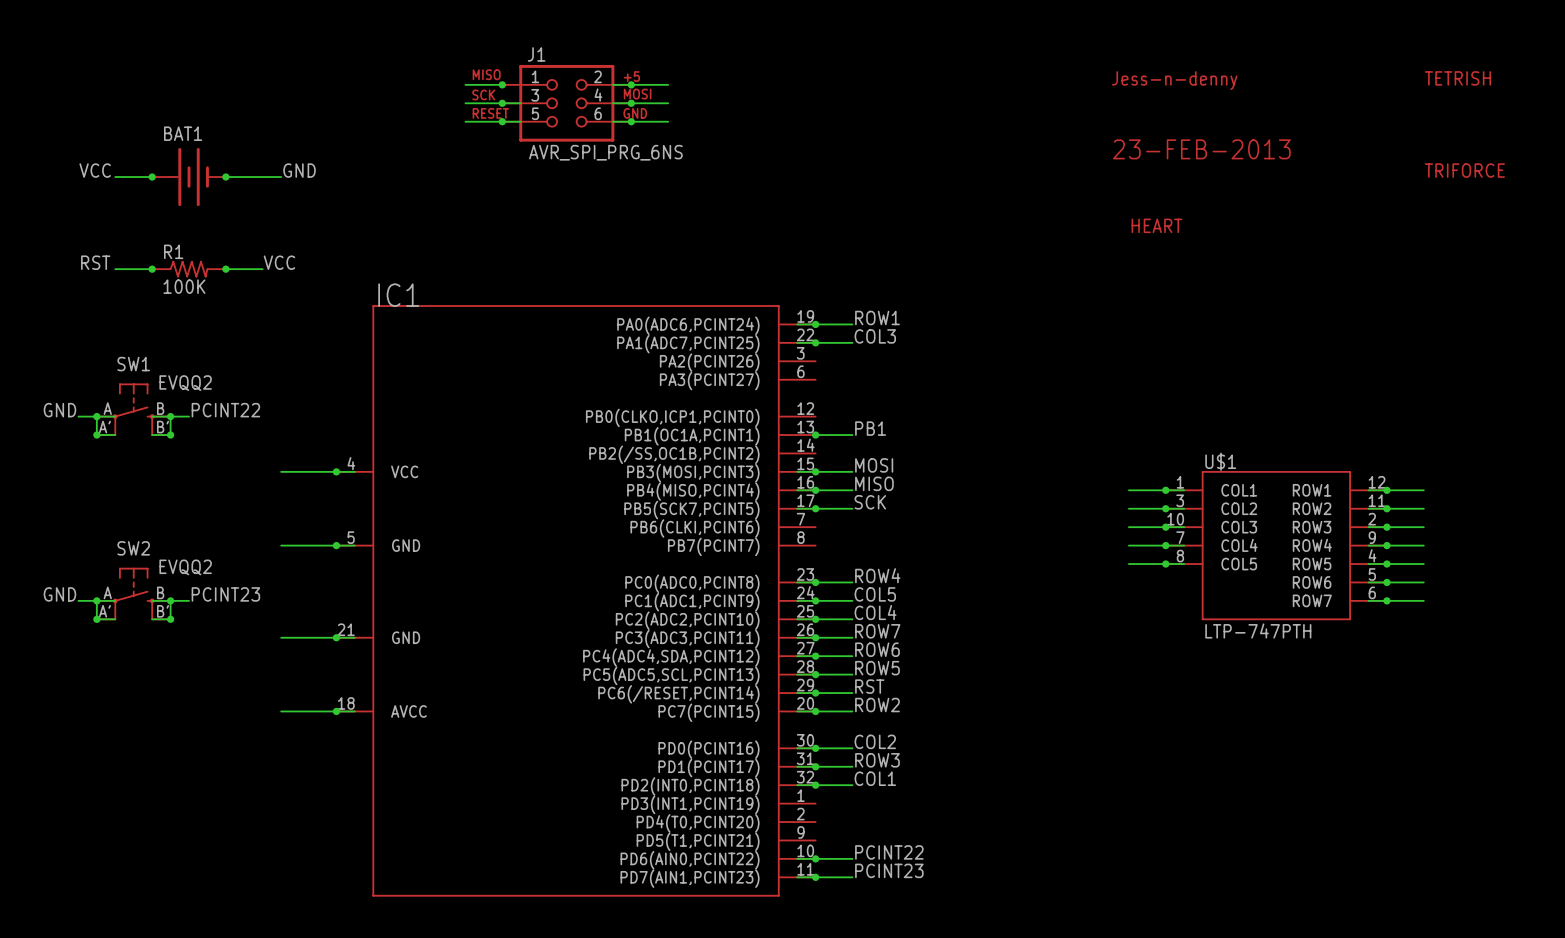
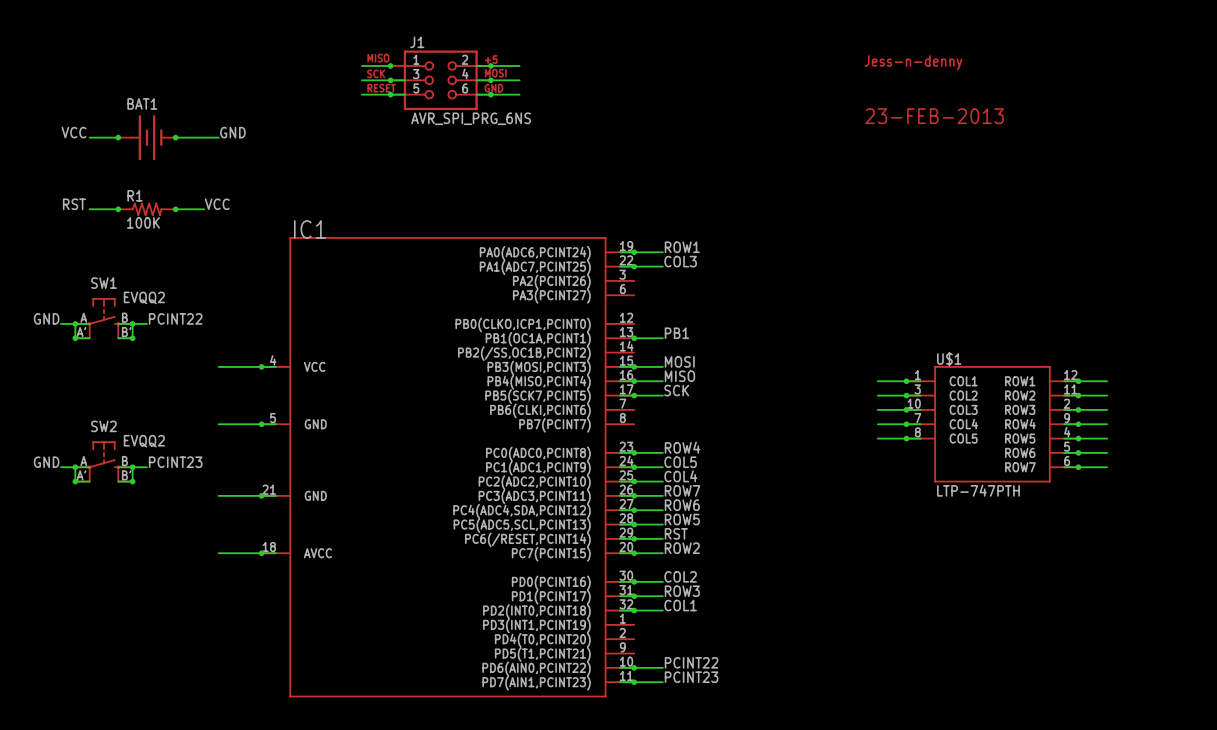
part: (1457, 78) -> none
part: (1464, 170) -> none
part: (1156, 225) -> none

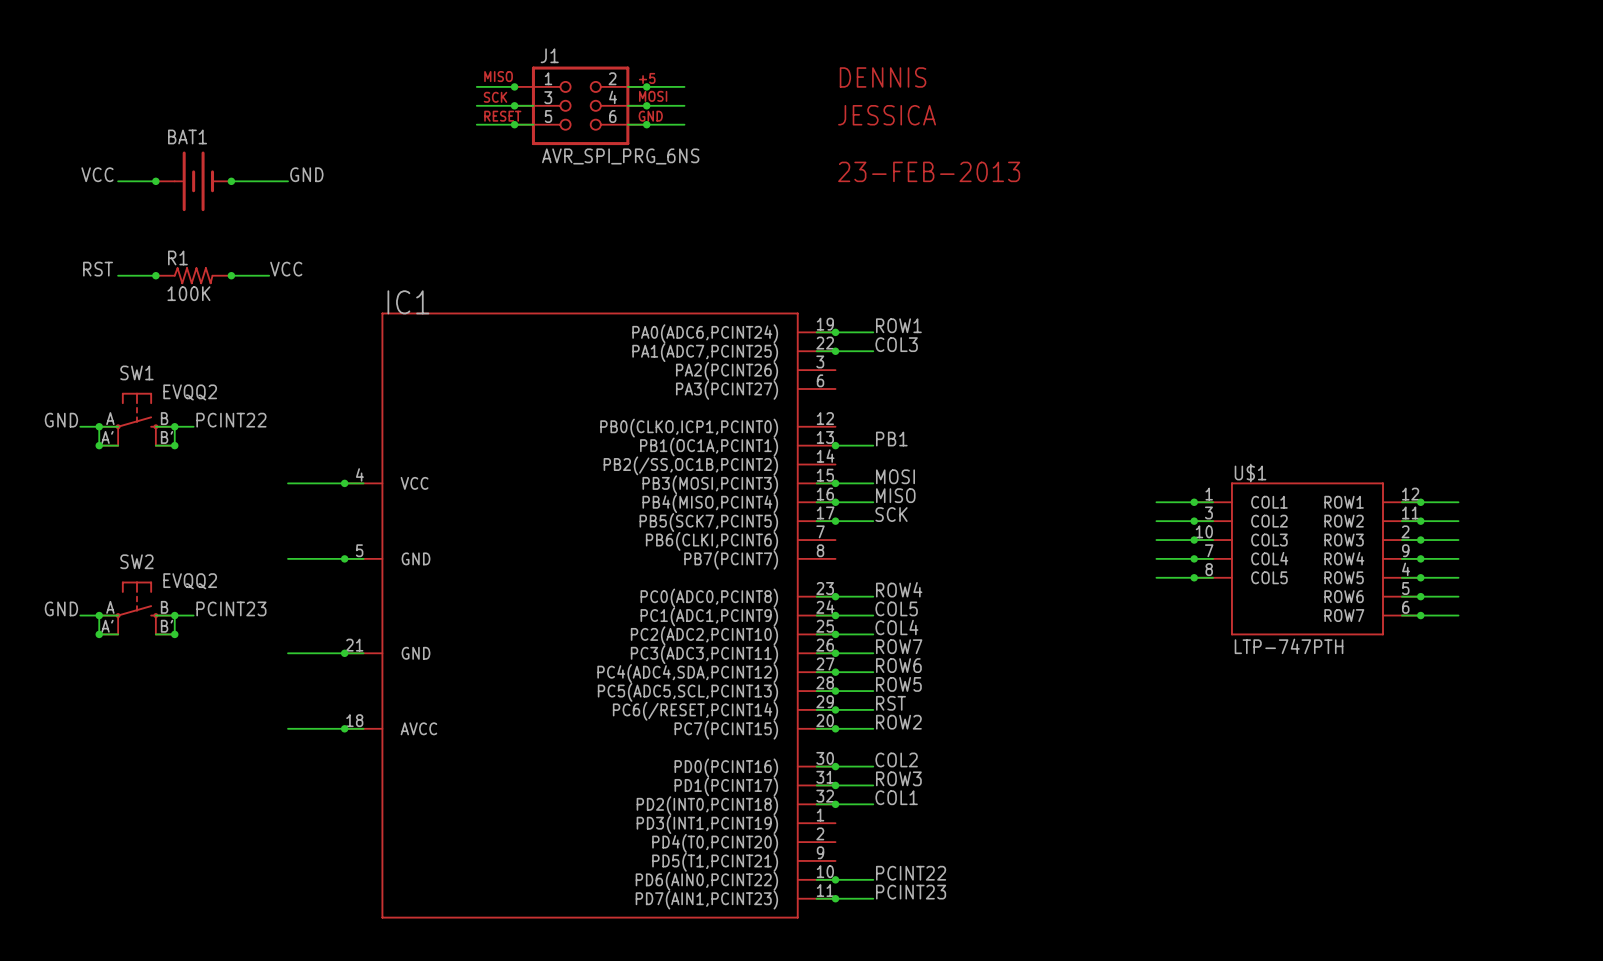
part: none -> (883, 77)
part: (913, 62) -> none
part: none -> (887, 115)
part: (934, 116) -> none
part: none -> (929, 171)

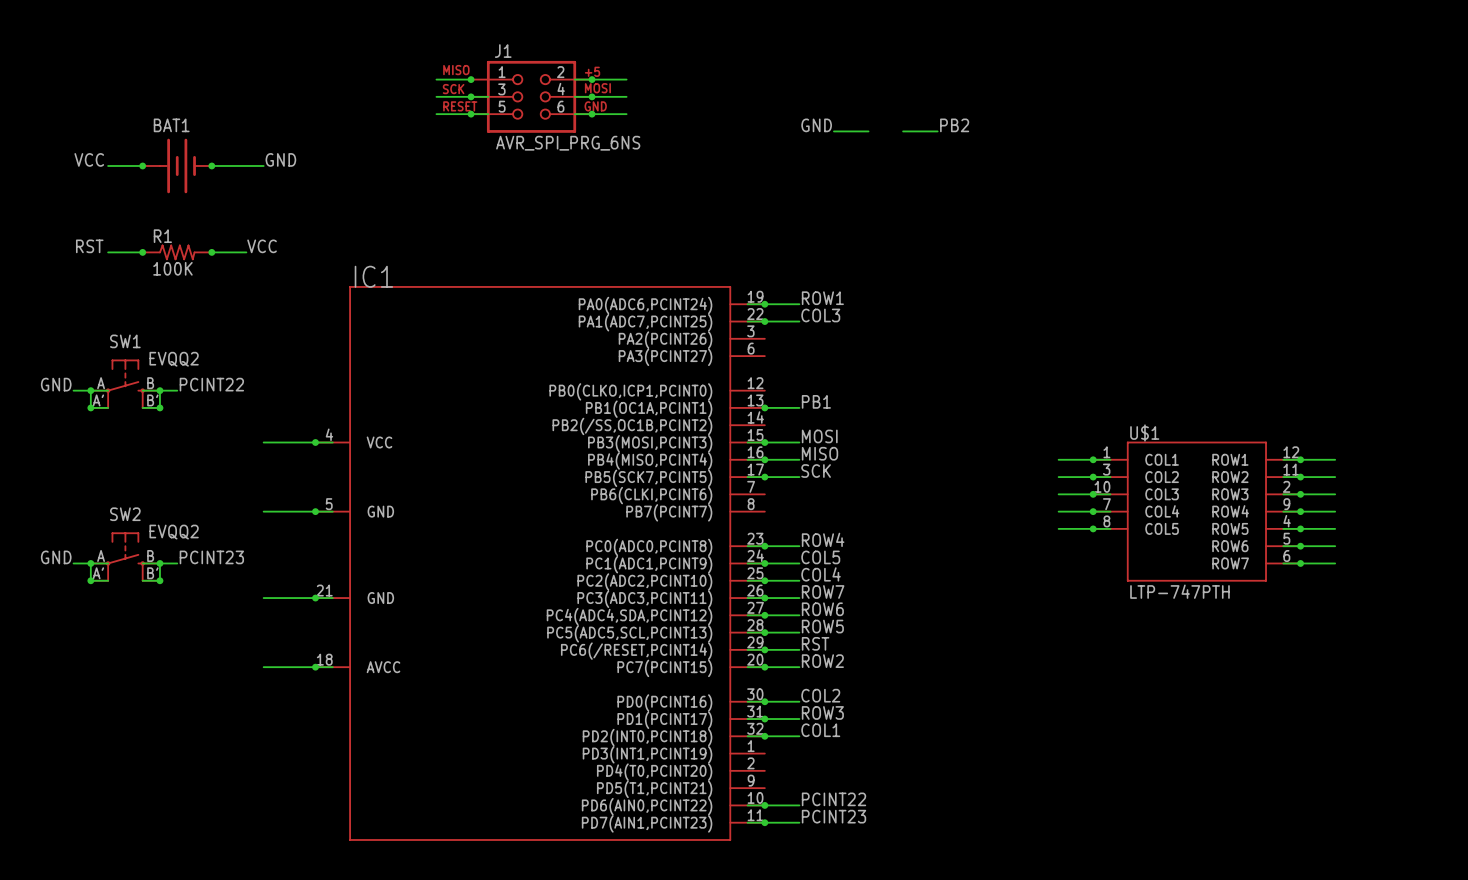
part: (883, 77) -> none
part: (887, 115) -> none
label: none -> GND (816, 125)
label: none -> PB2 (954, 125)
wire: none -> (833, 131) (868, 131)
wire: none -> (903, 131) (937, 131)
part: (929, 171) -> none

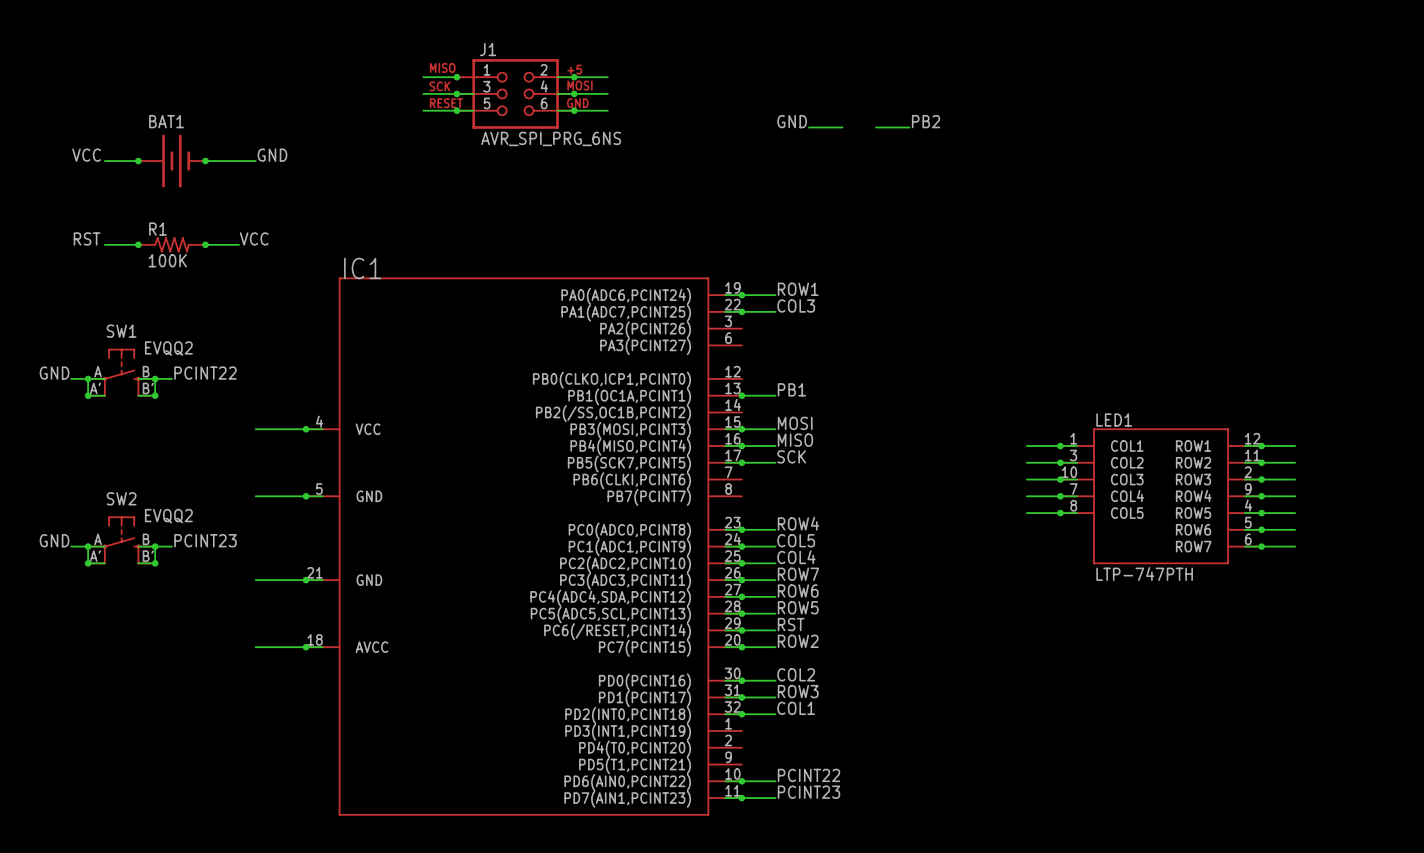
U$1 name: U$1 (1144, 432) -> LED1 (1114, 420)

